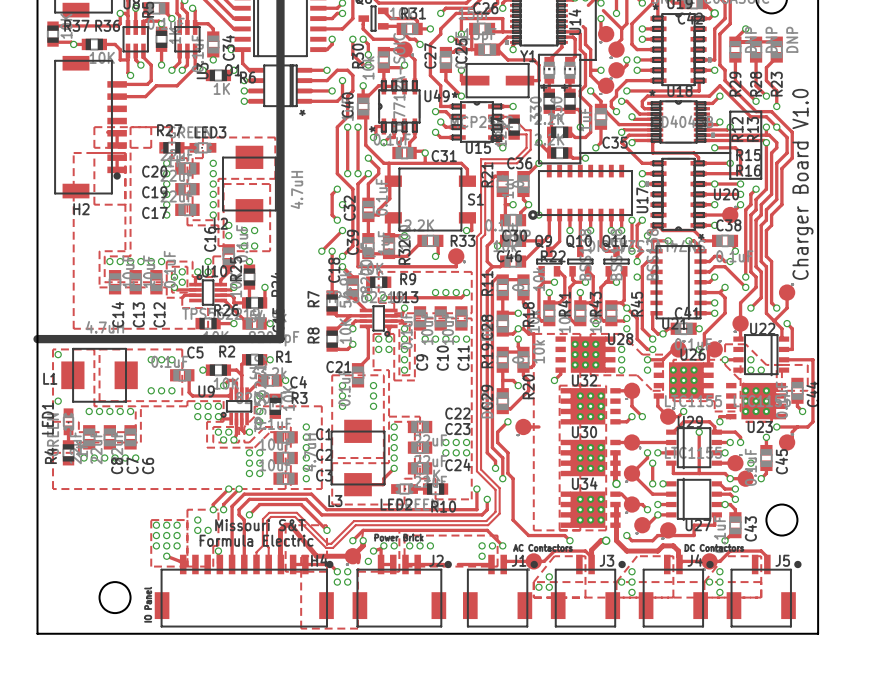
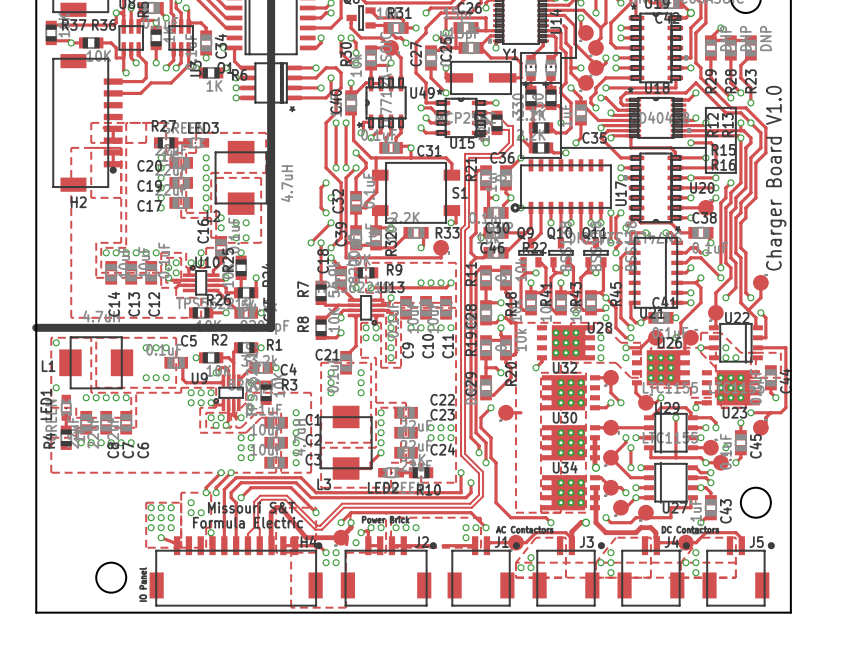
track: none -> (543, 5) (568, 5)
track: none -> (543, 10) (583, 10)
track: none -> (543, 15) (564, 15) (574, 25) (574, 43) (594, 63) (595, 67)

